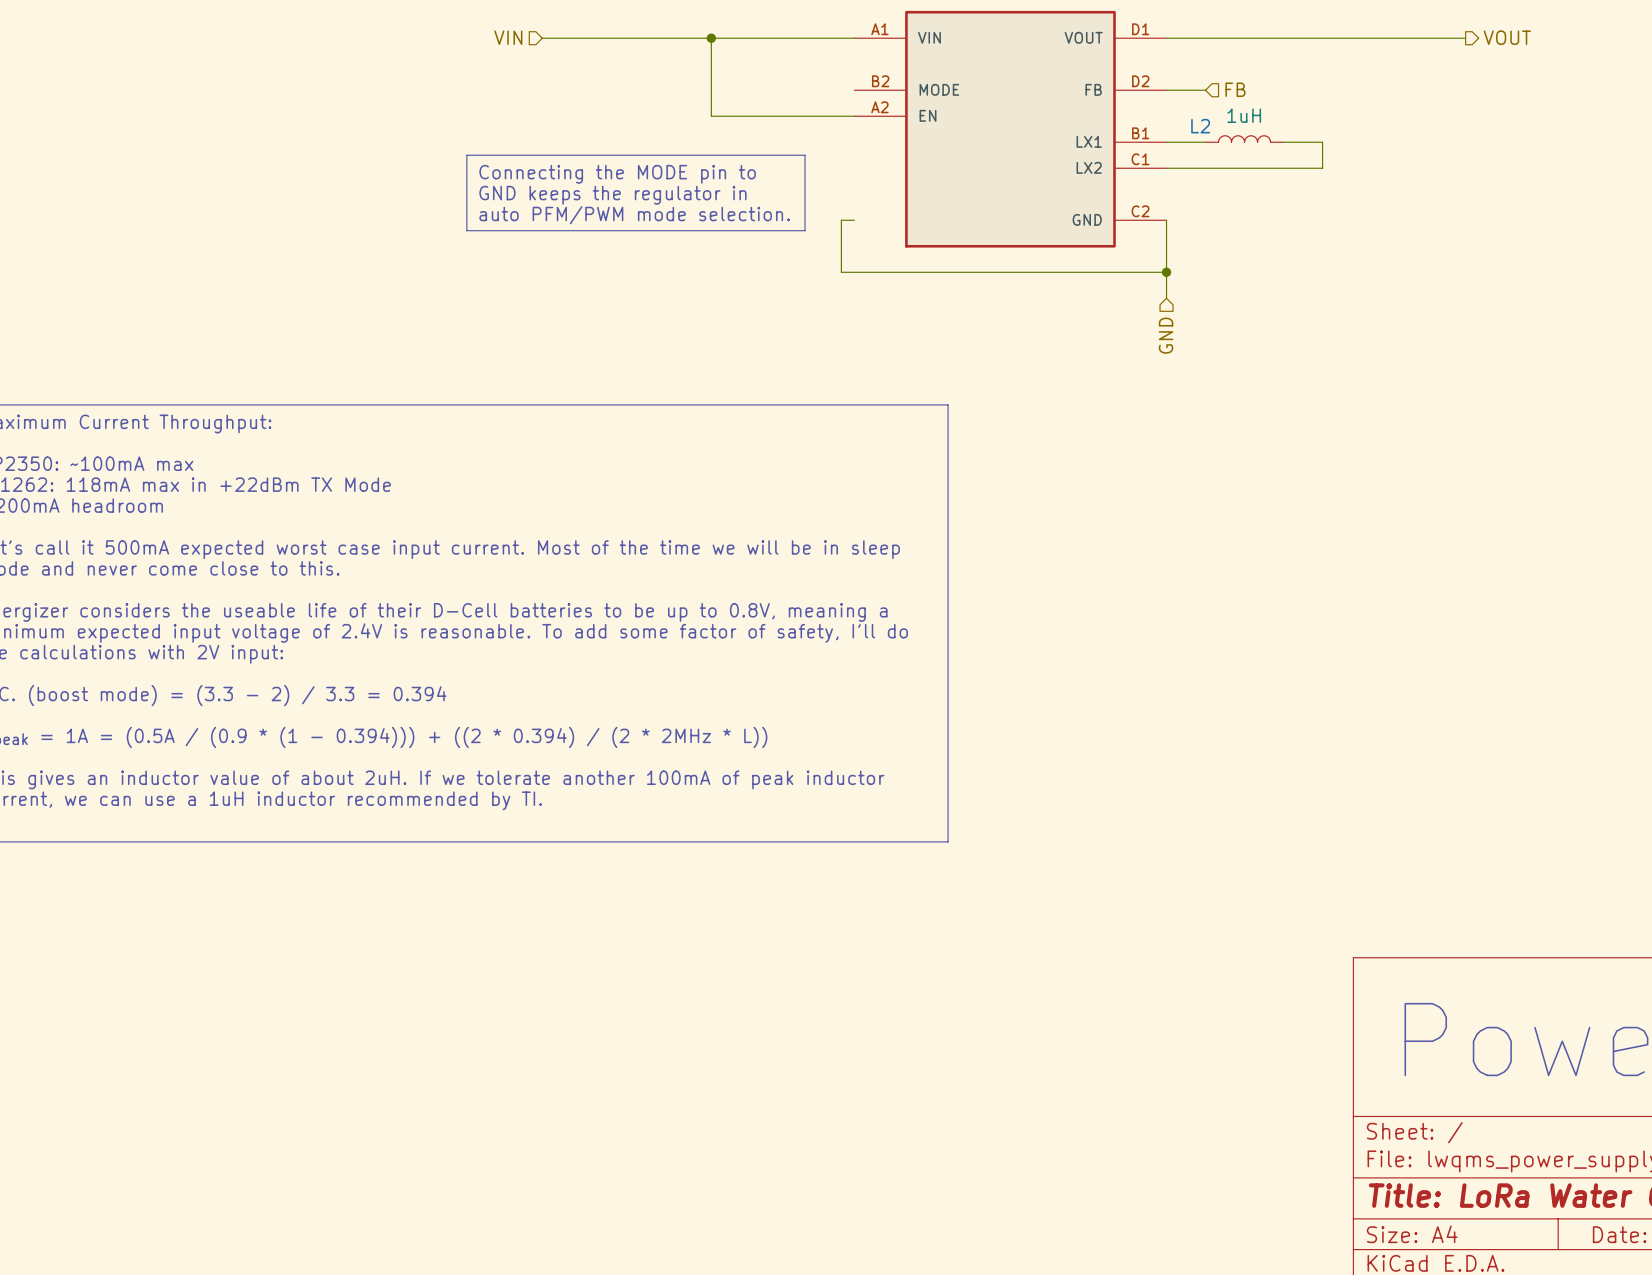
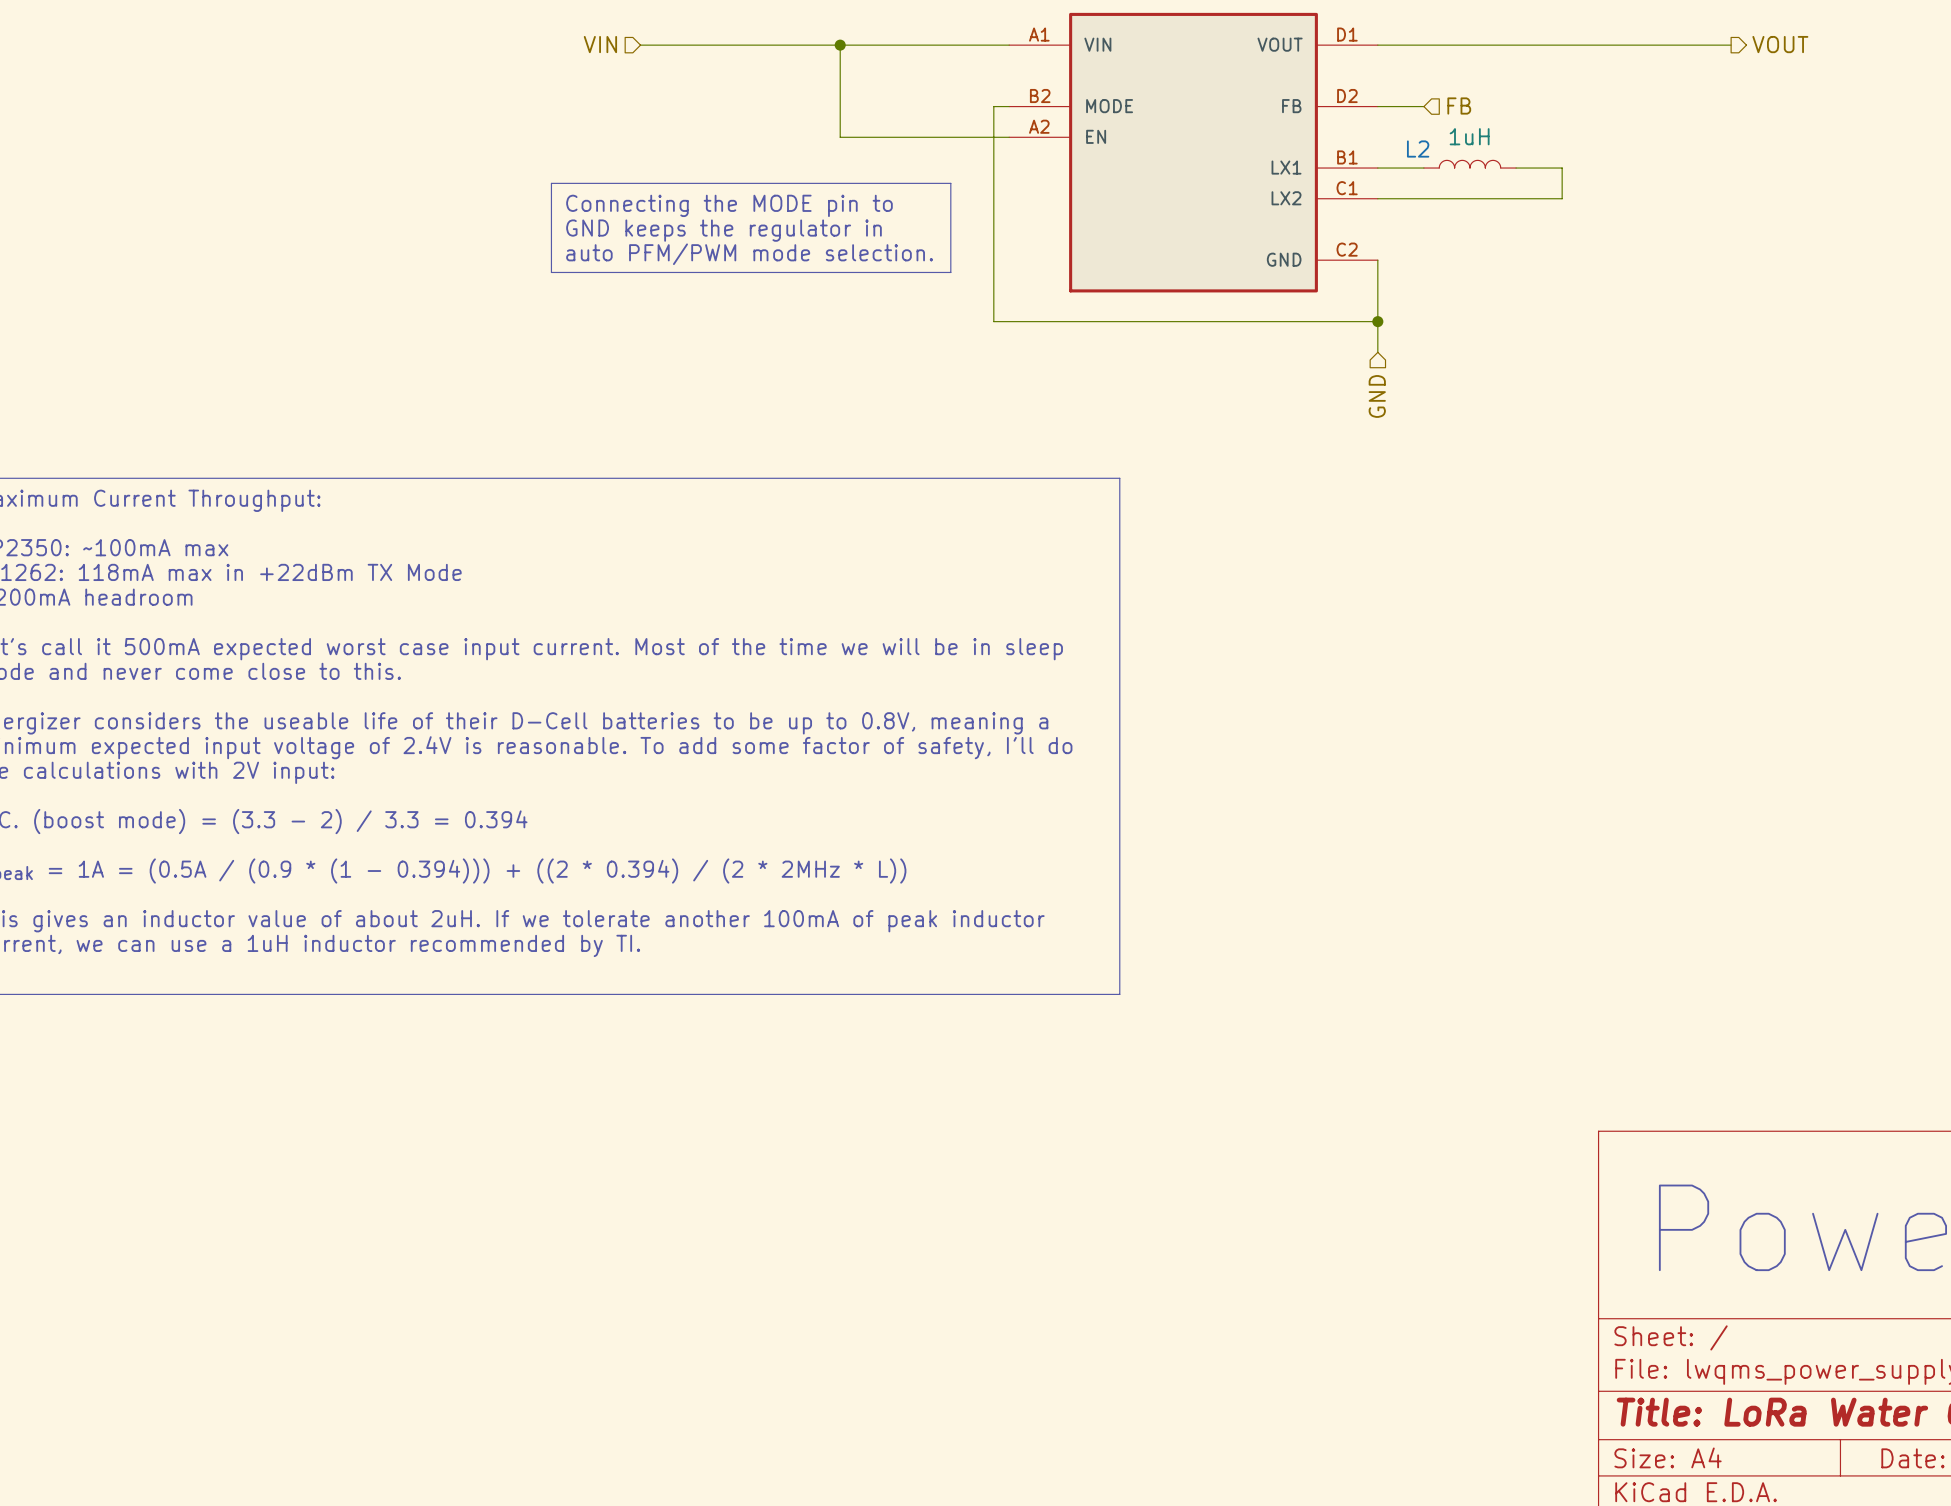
wire: (841, 220) (854, 220) -> (993, 260) (993, 106) (1009, 106)

